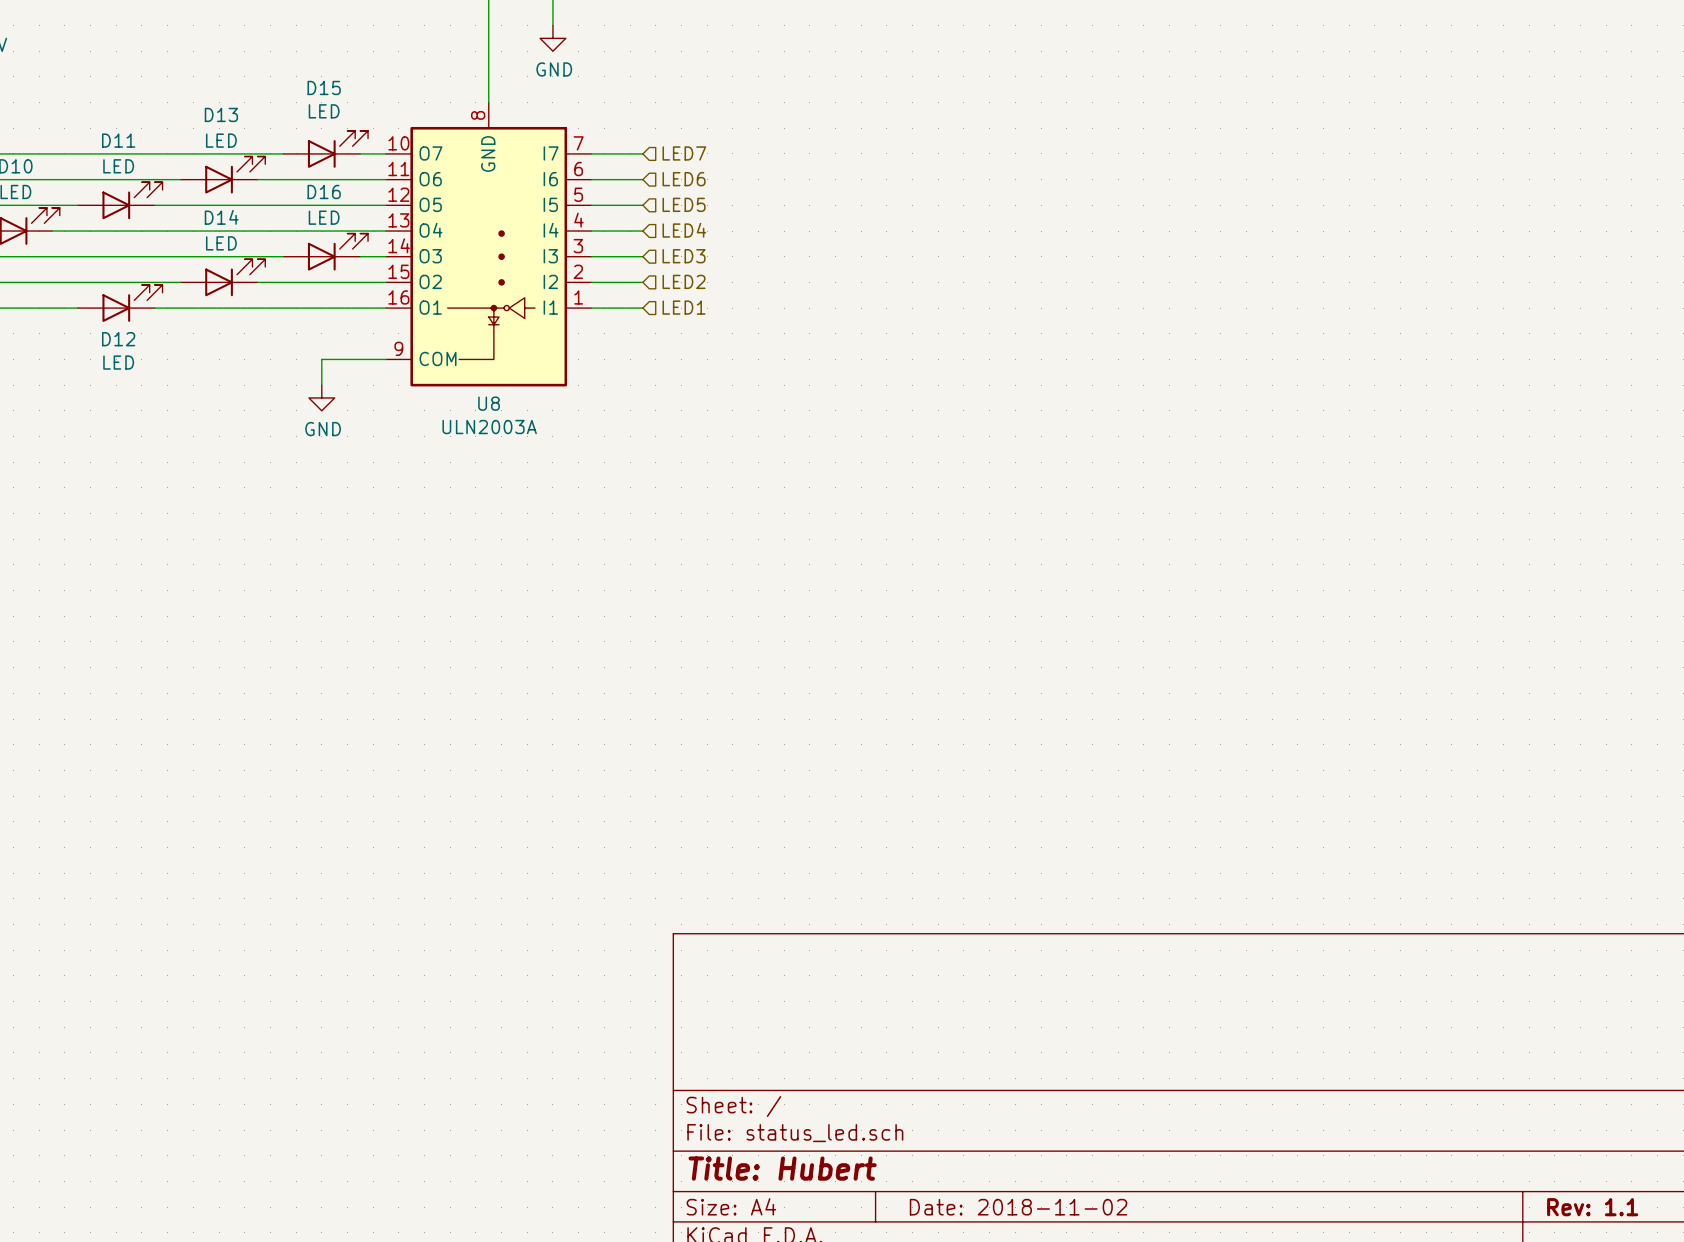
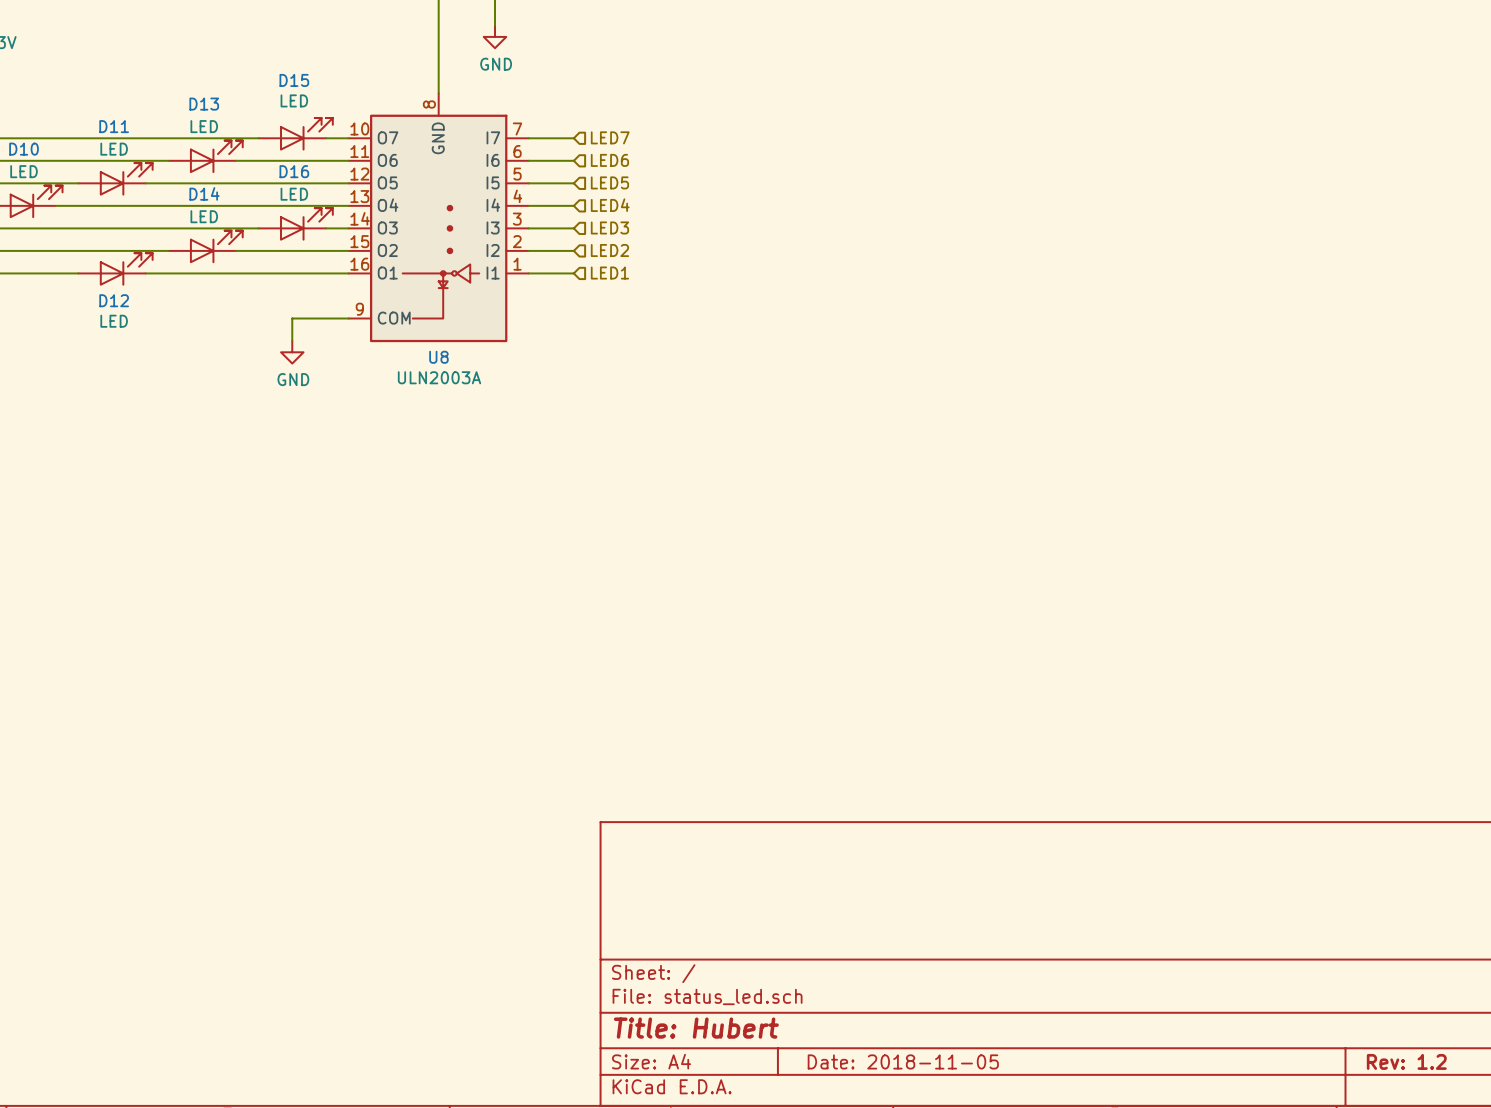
title block: Date: 2018-11-02 (1018, 1207) -> Date: 2018-11-05 (903, 1061)
title block: Rev: 1.1 (1592, 1207) -> Rev: 1.2 (1406, 1061)

